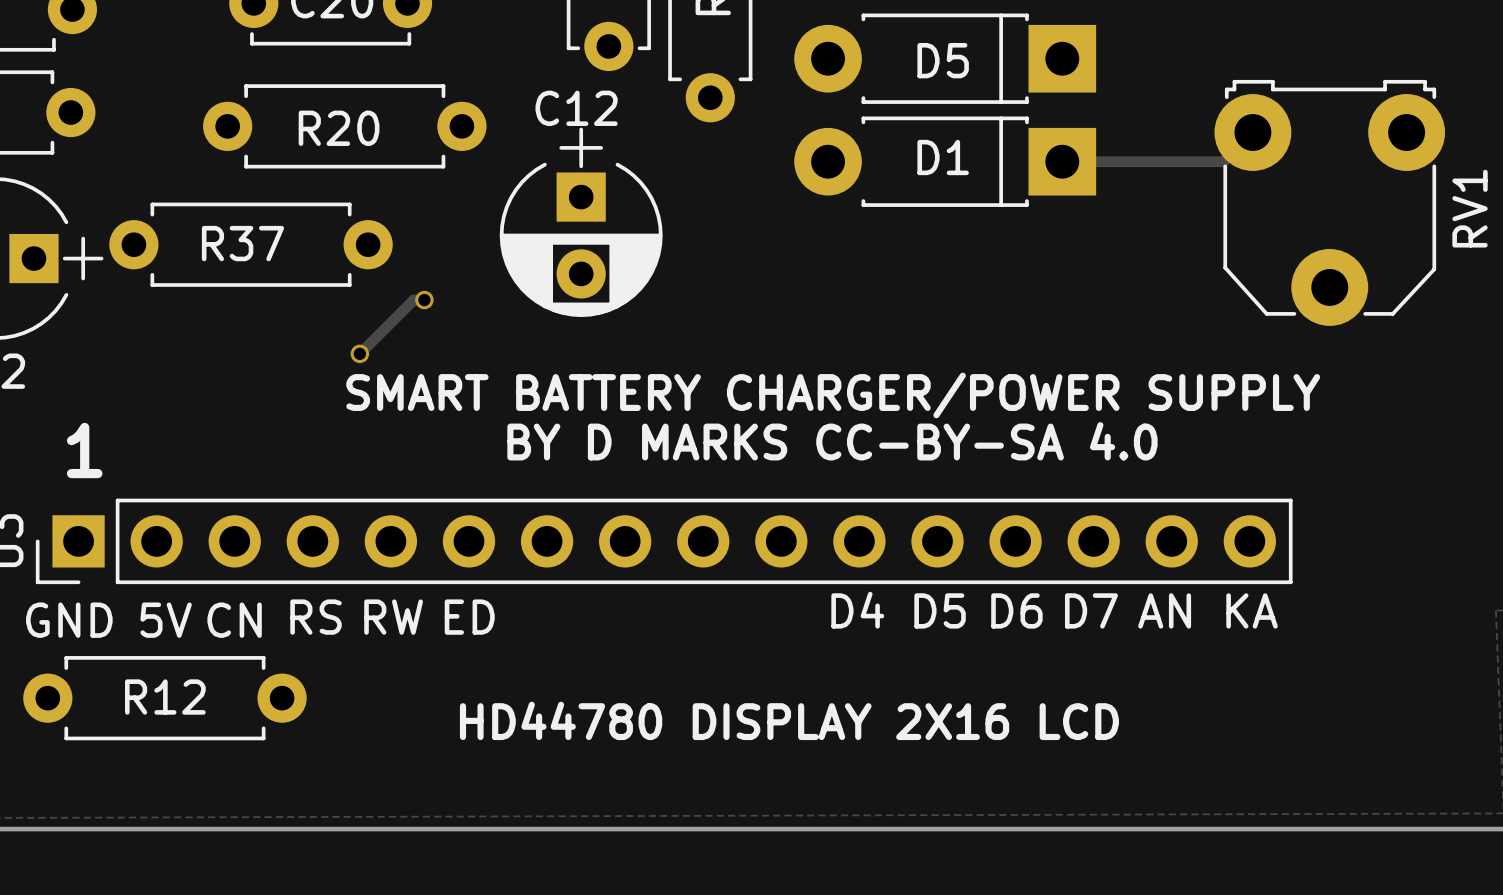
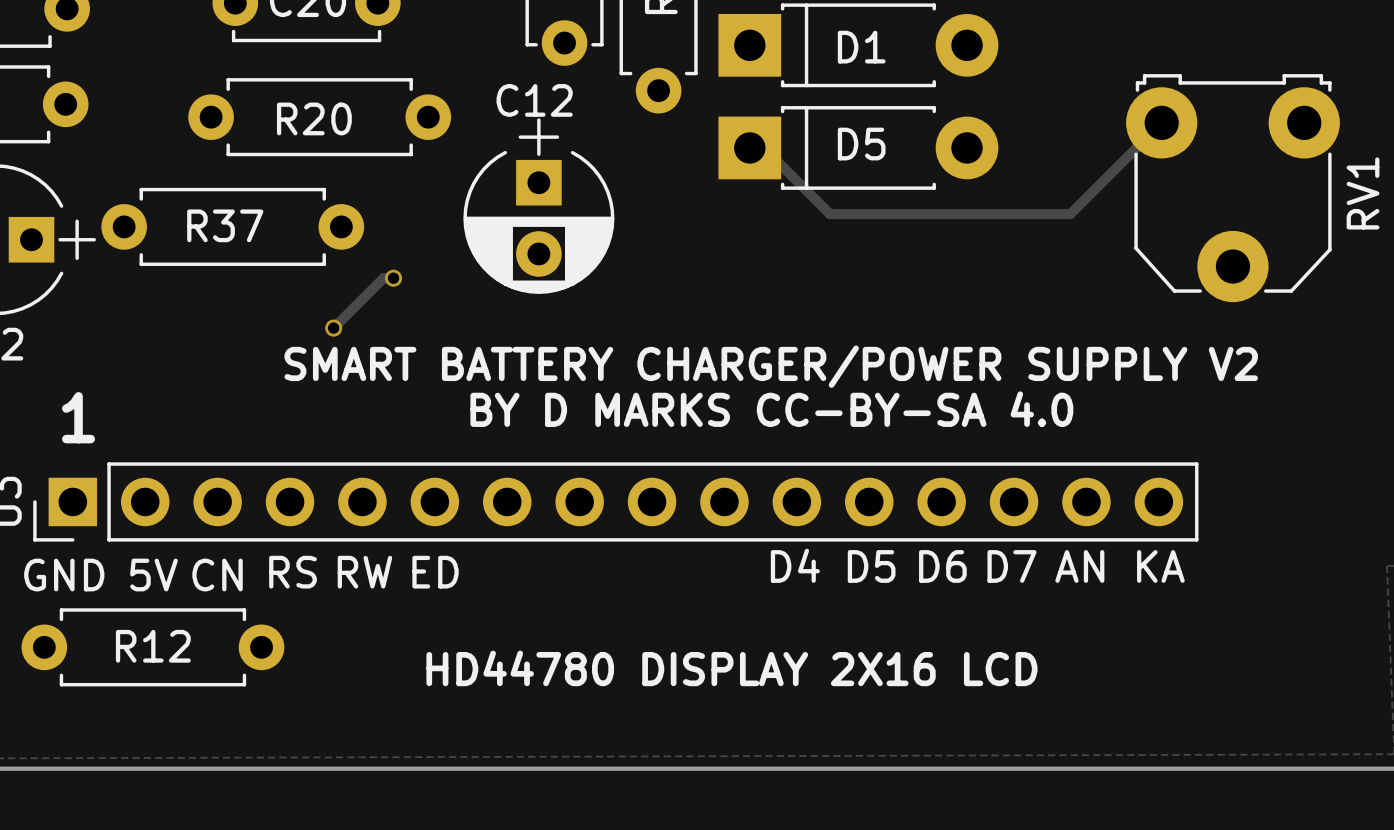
D5 rotation: 0° (945, 58) -> 180° (858, 147)
D1 rotation: 0° (945, 161) -> 180° (858, 45)
track: (1062, 161) (1223, 161) -> (749, 147) (763, 147) (829, 214) (1070, 214) (1134, 149)
text: SMART BATTERY CHARGER/POWER SUPPLY (833, 395) -> SMART BATTERY CHARGER/POWER SUPPLY V2 (771, 366)

